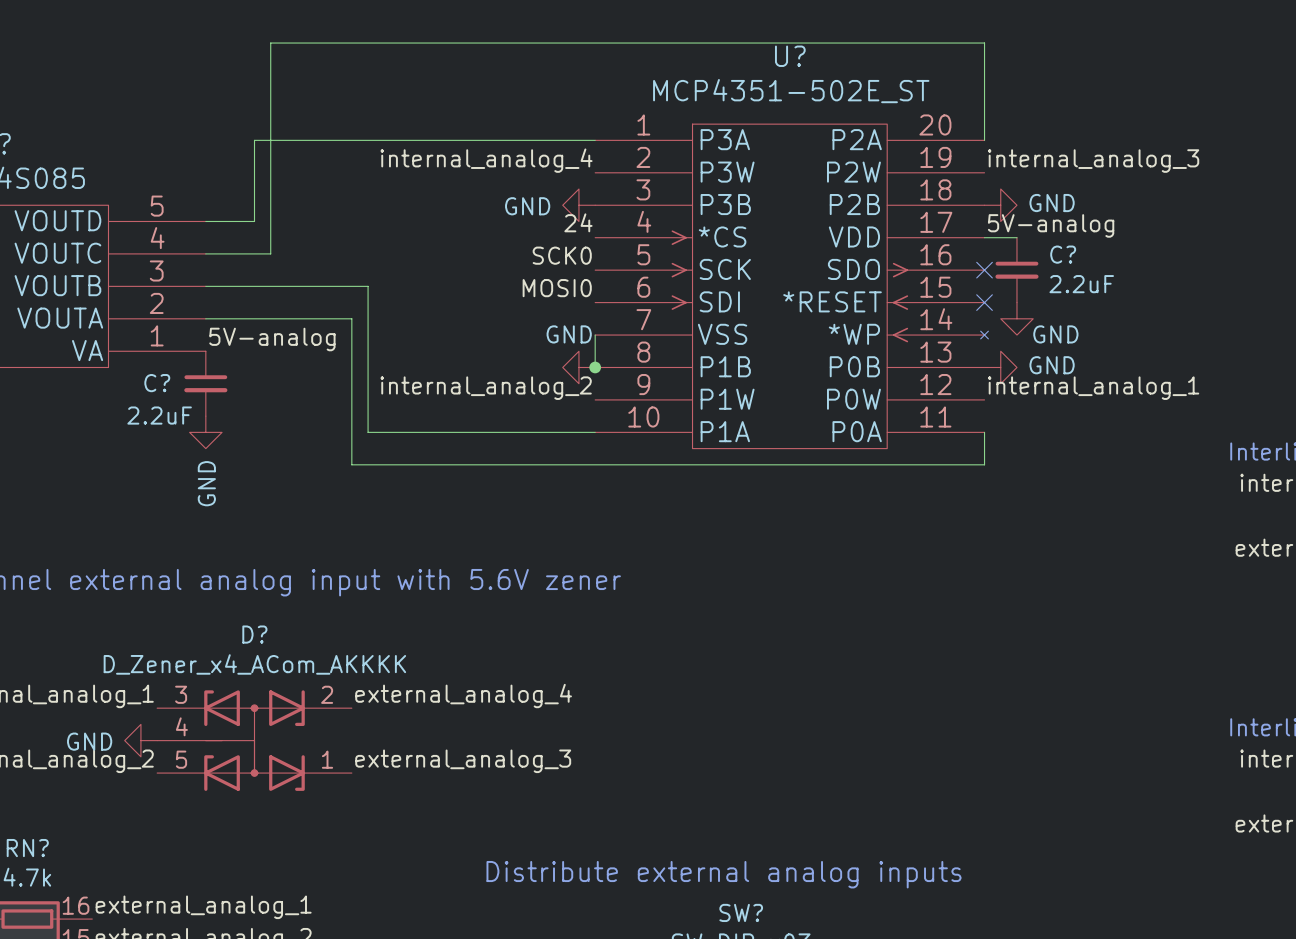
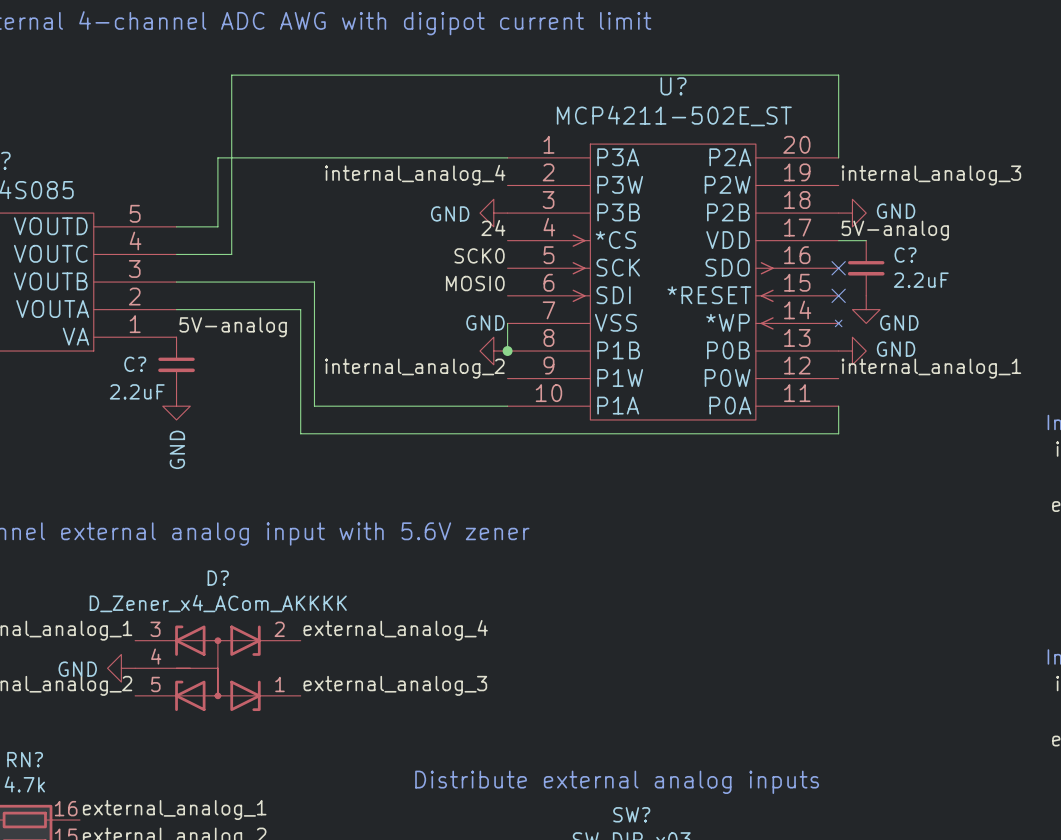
U? value: MCP4351-502E_ST (791, 91) -> MCP4211-502E_ST (674, 116)

